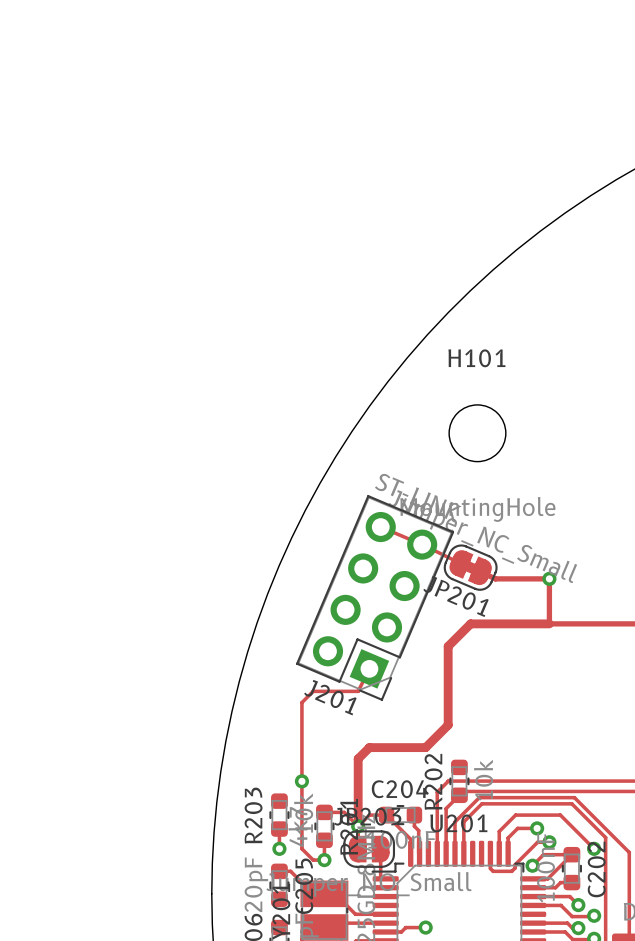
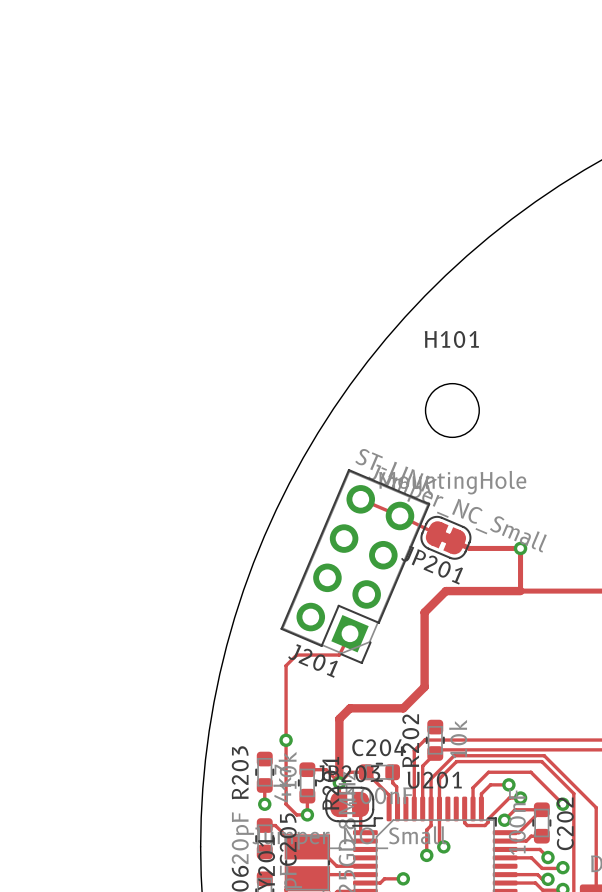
track: none -> (431, 808) (431, 825) (426, 829) (426, 855)
track: none -> (439, 808) (439, 842) (443, 846)
via: none -> (443, 846)
via: none -> (426, 855)

